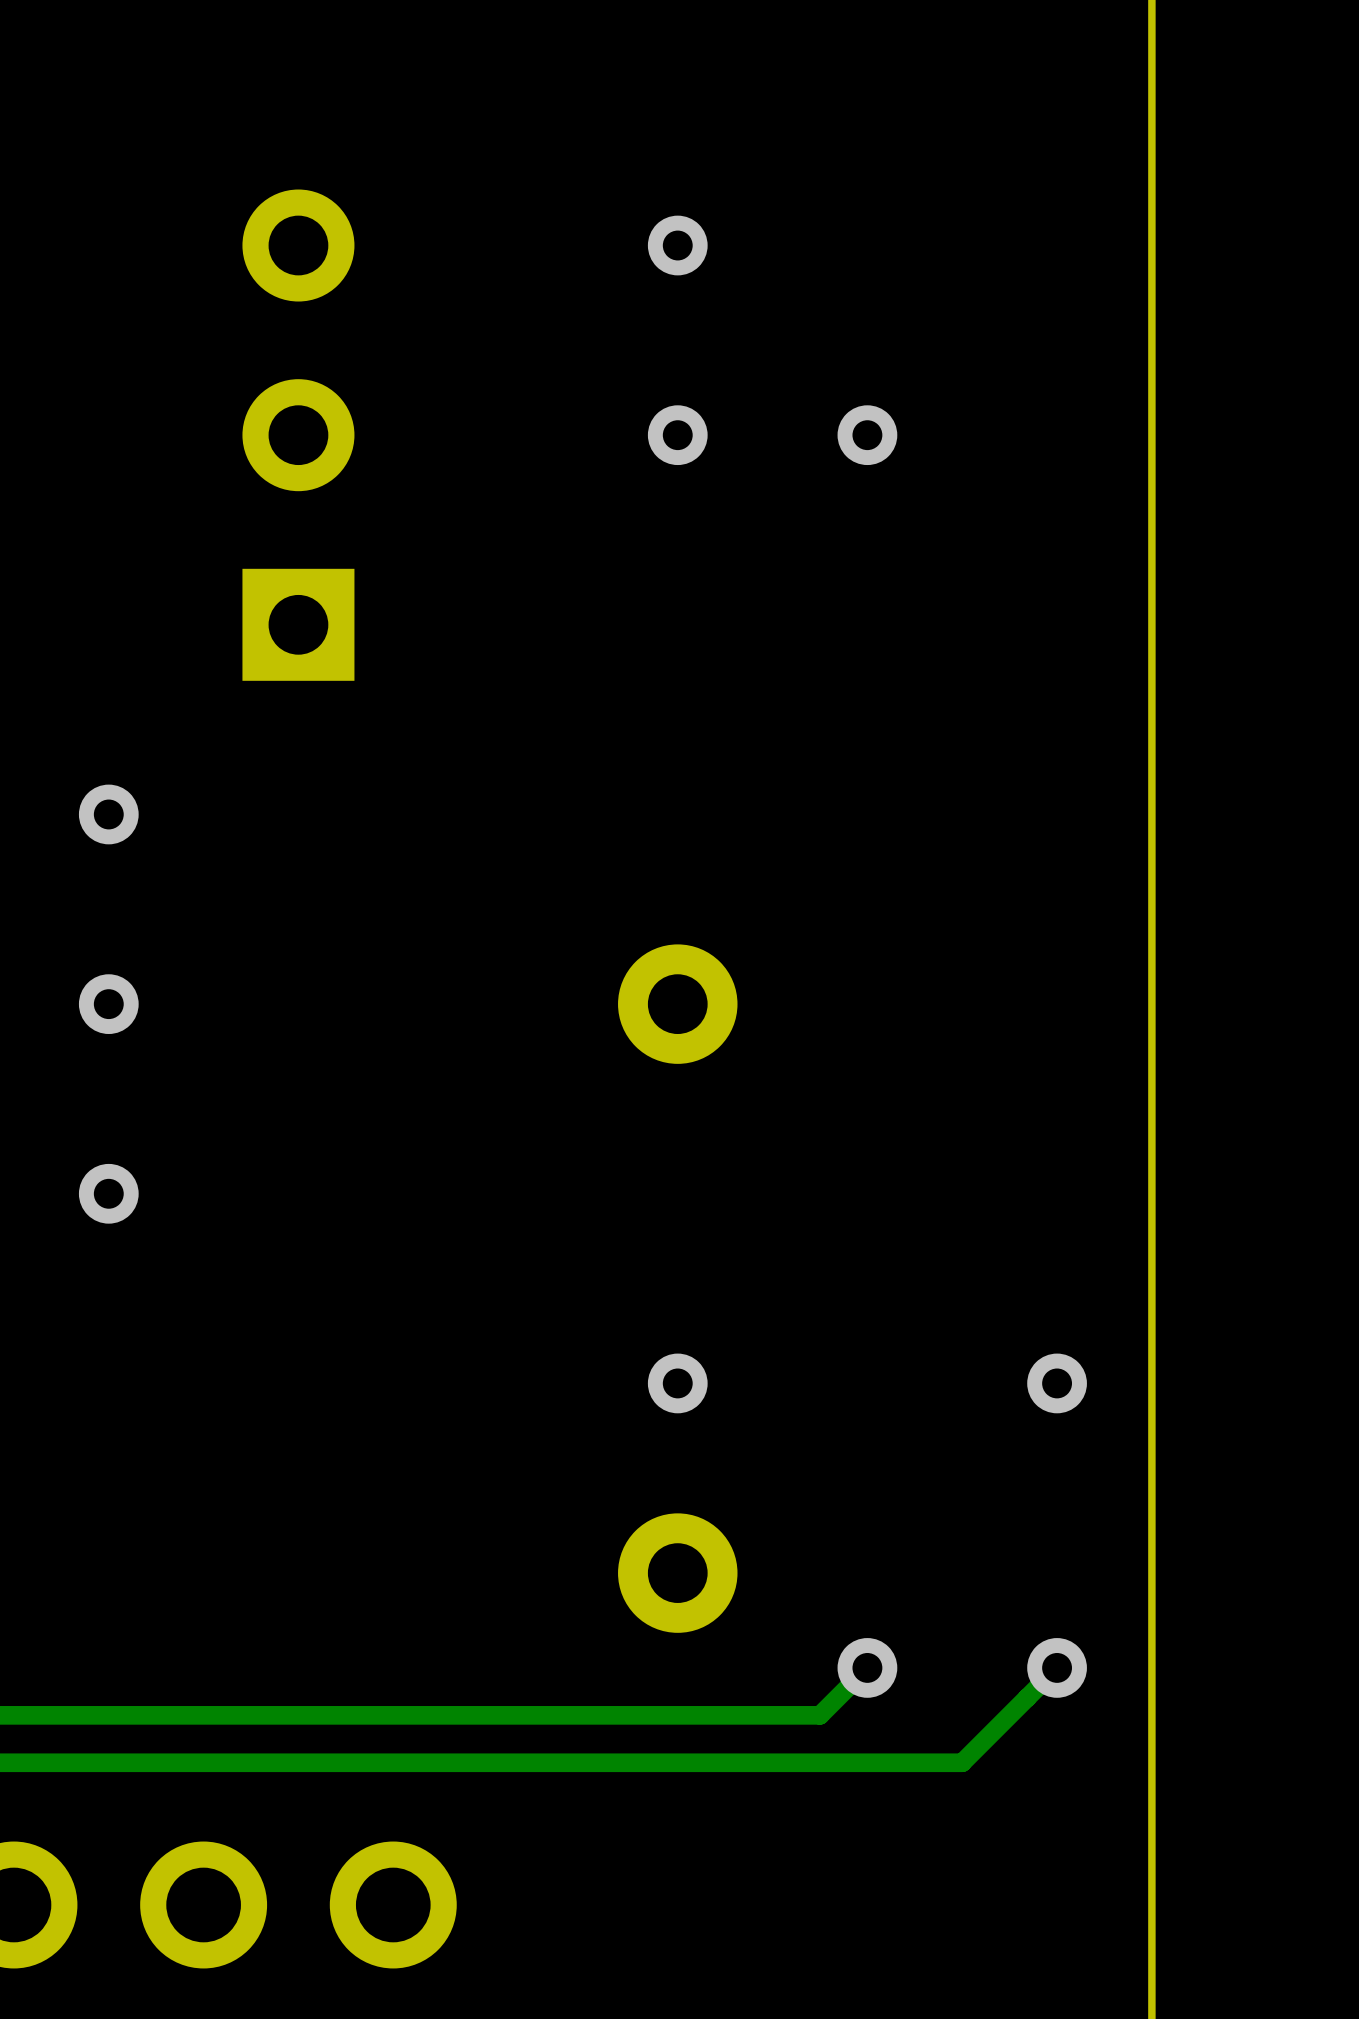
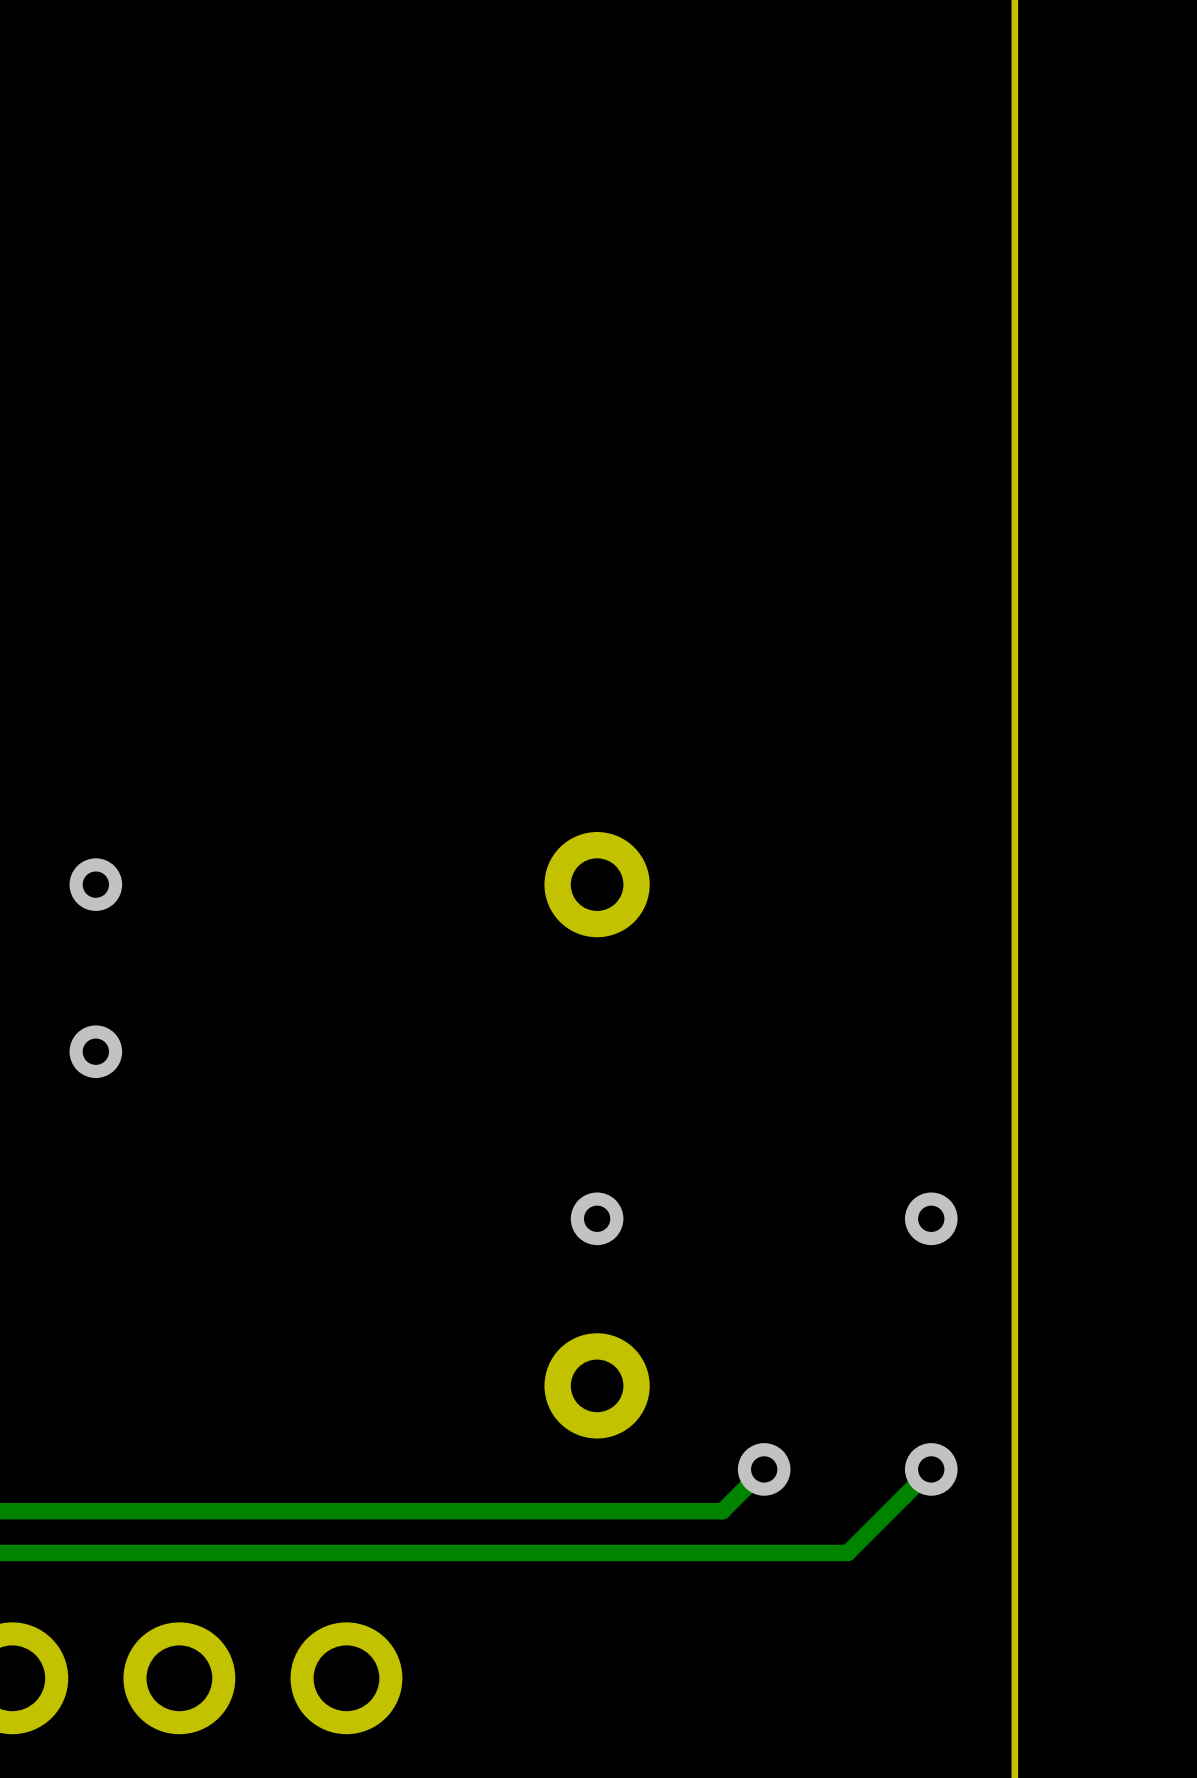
via: (677, 245) -> none
part: (298, 435) -> none
via: (677, 435) -> none
via: (867, 435) -> none
via: (108, 814) -> none

